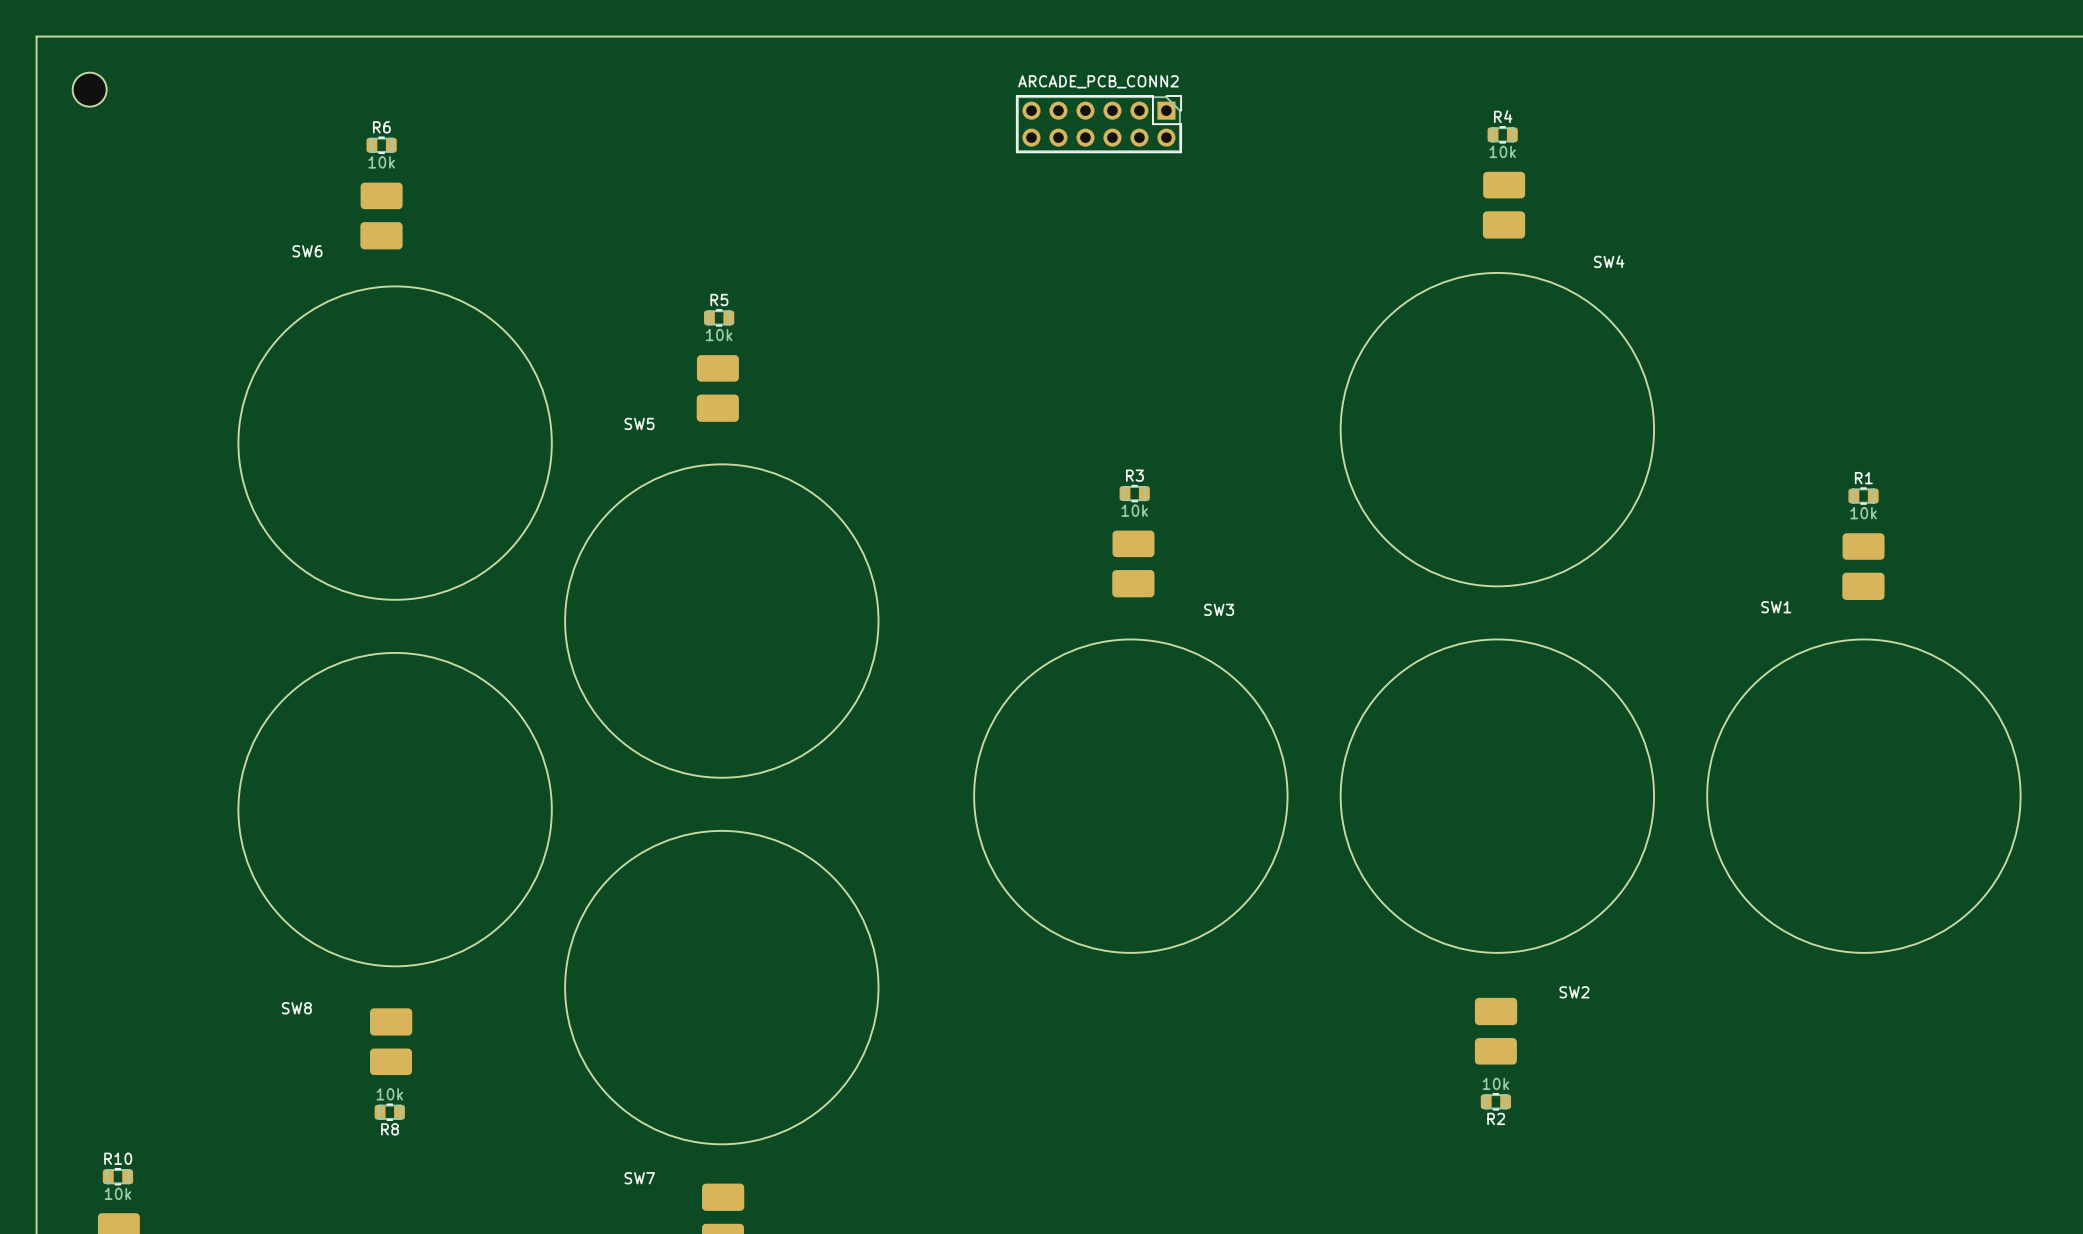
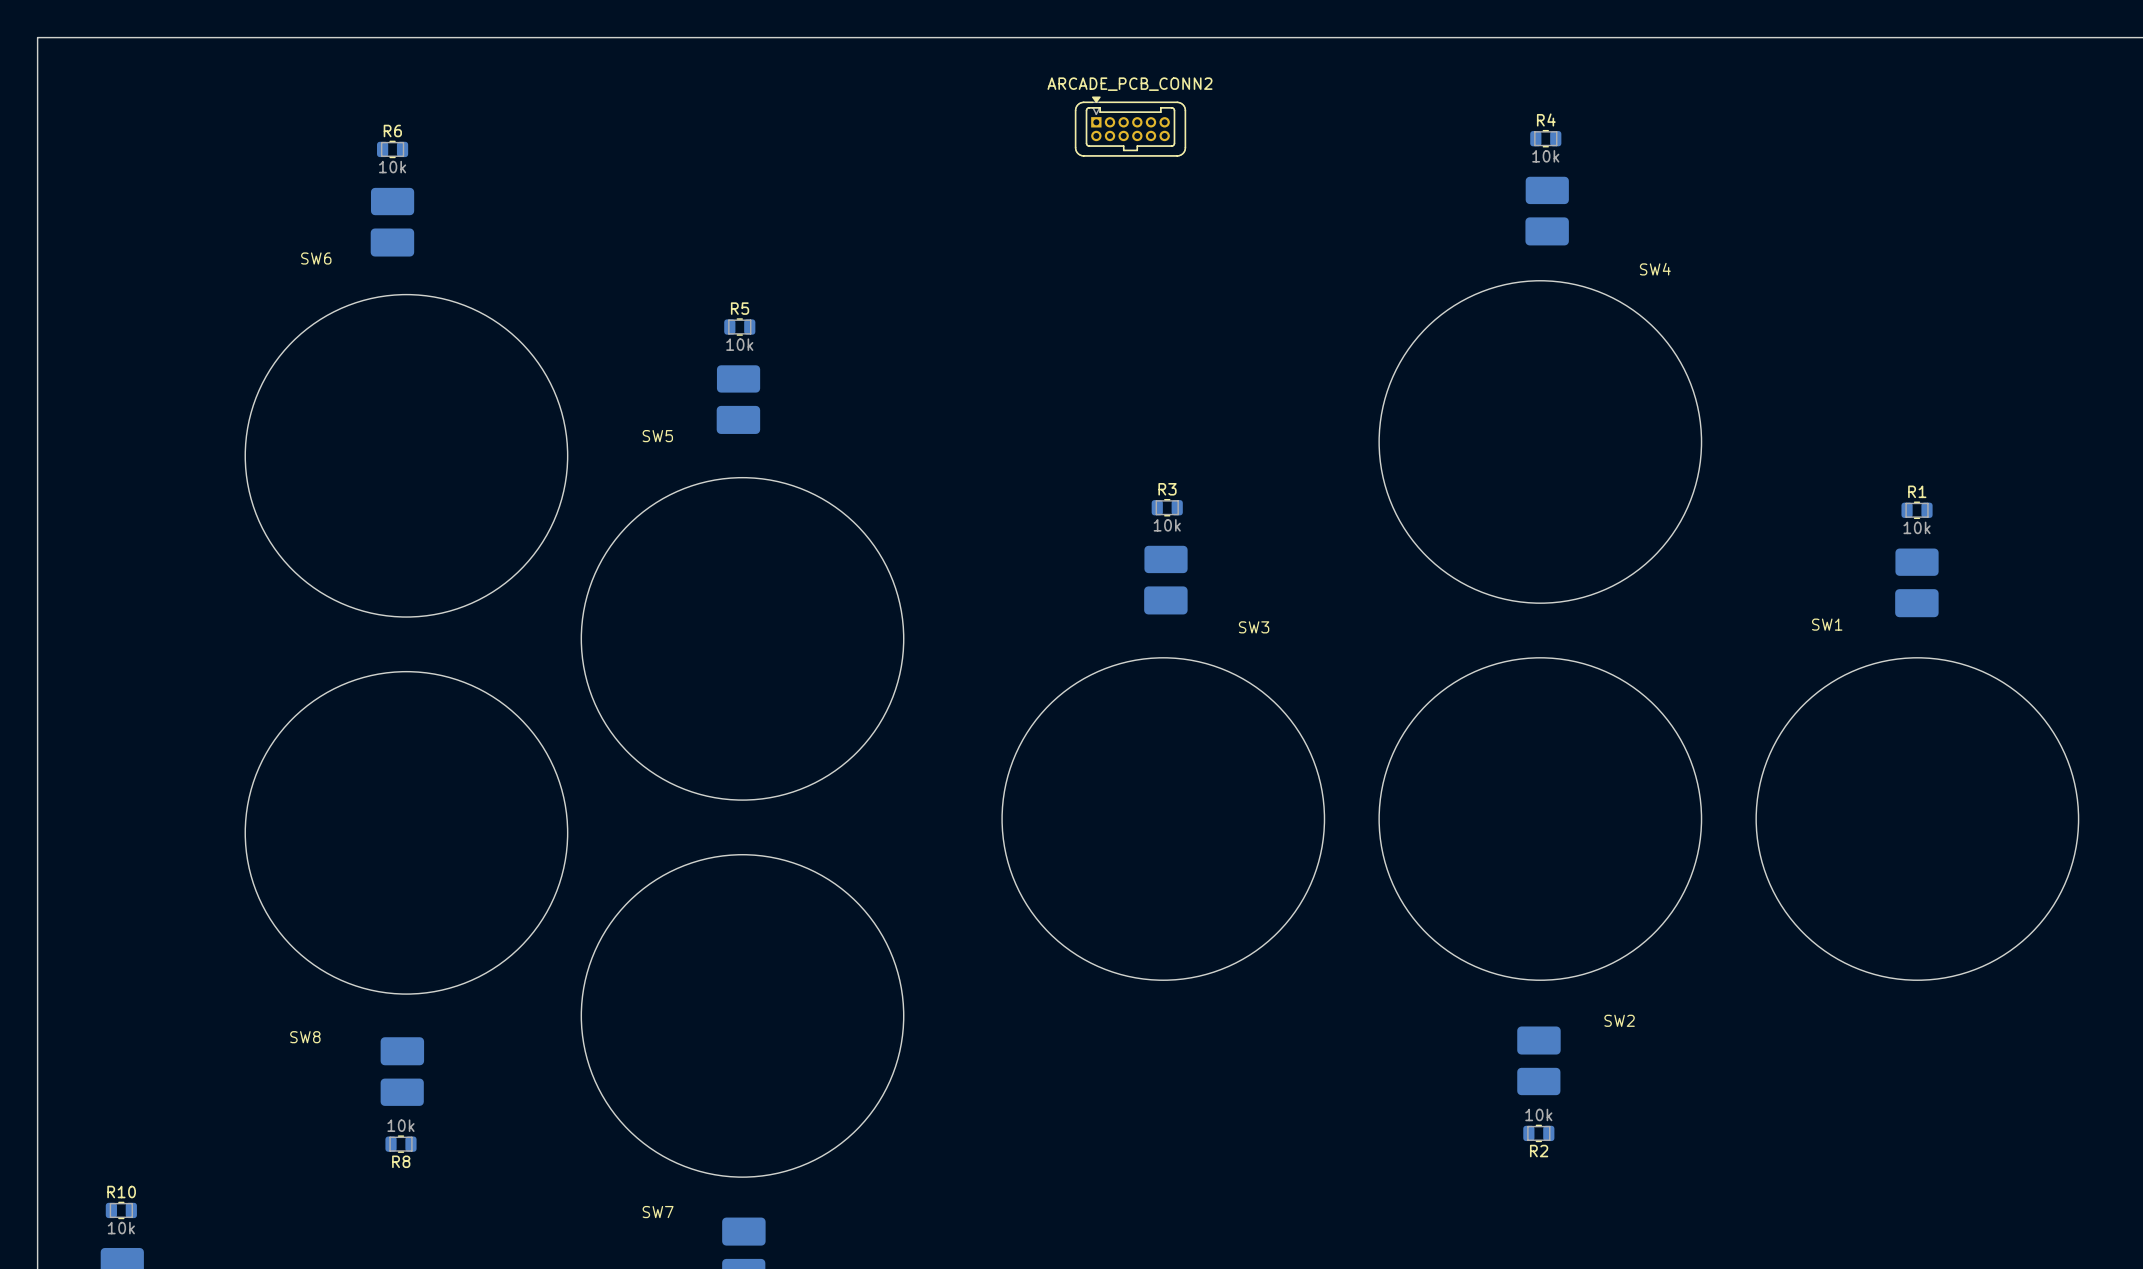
part: (89, 89) -> none
ARCADE_PCB_CONN2 footprint: [1016, 95, 1182, 153] -> [1074, 96, 1187, 157]

